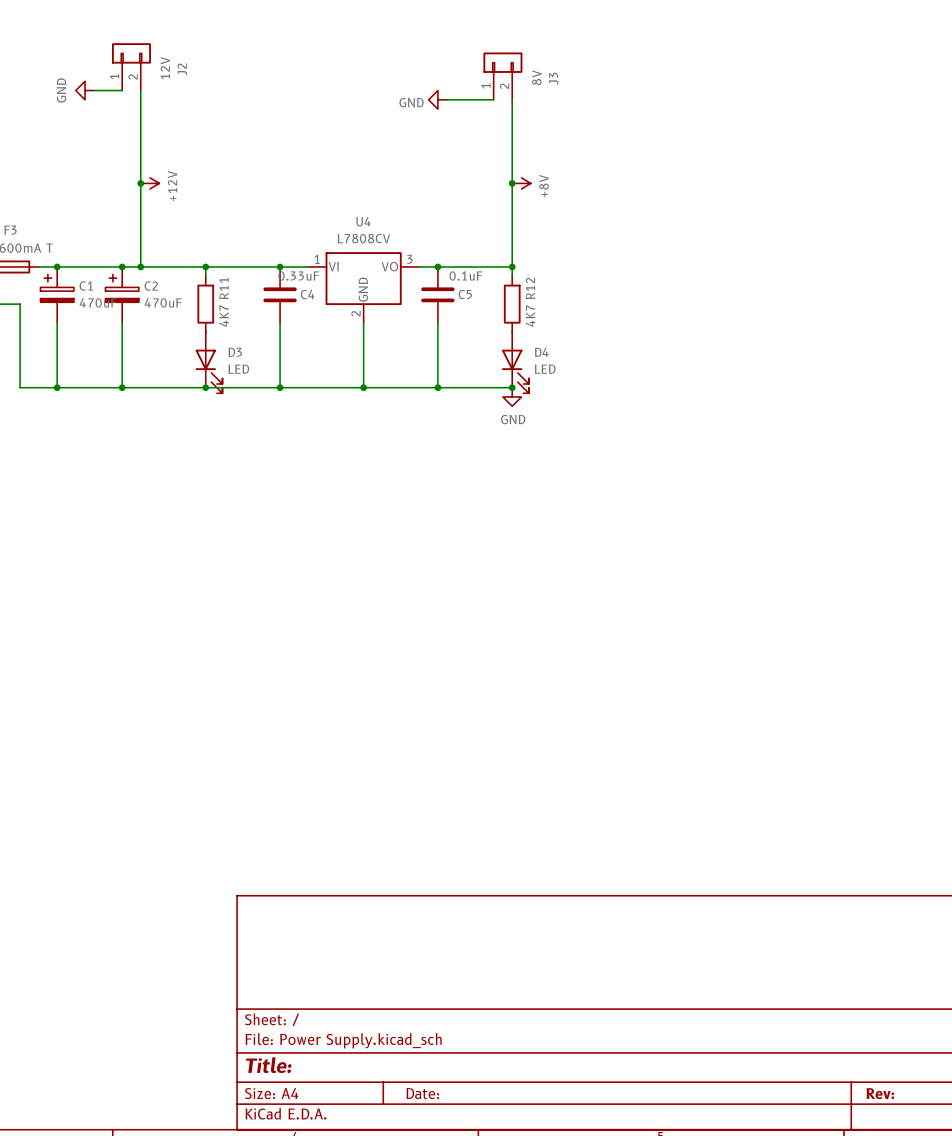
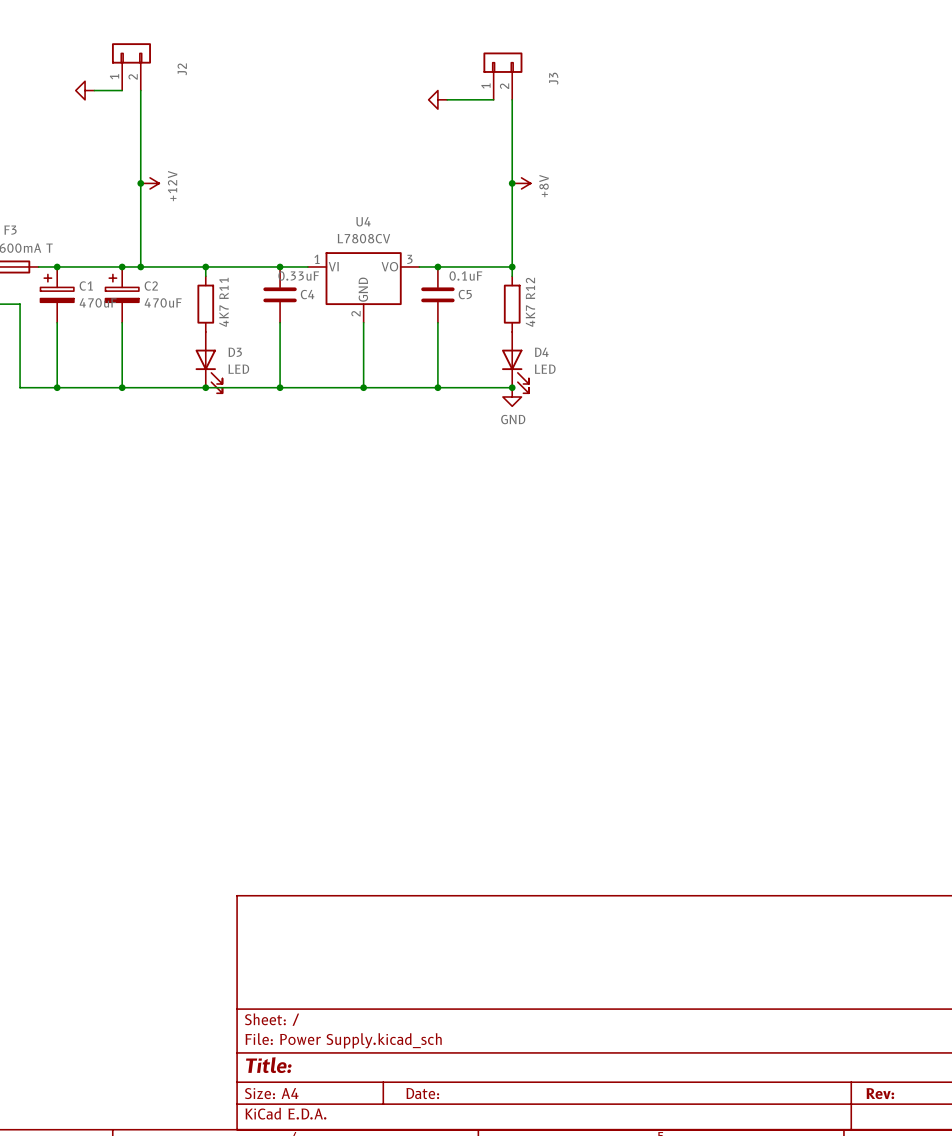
J2 value: 12V (165, 68) -> none
J3 value: 8V (536, 77) -> none
power symbol text: GND (61, 90) -> none
power symbol text: GND (411, 102) -> none

